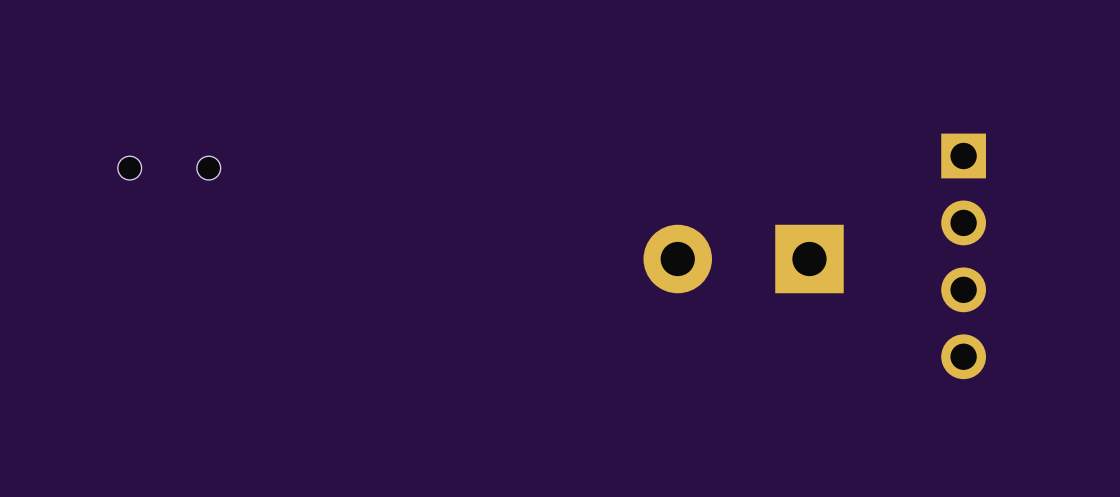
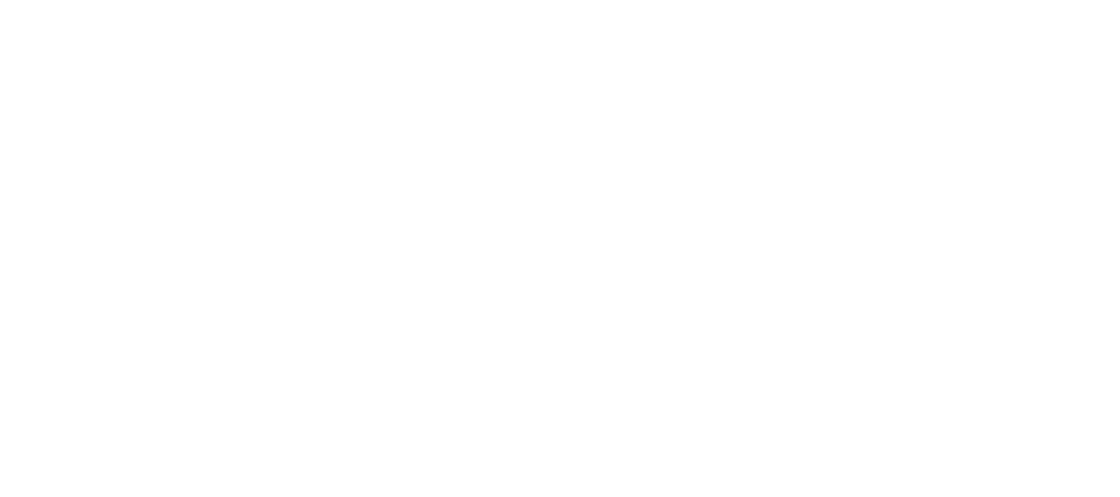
part: (169, 168) -> none
part: (963, 256) -> none
part: (743, 259) -> none

